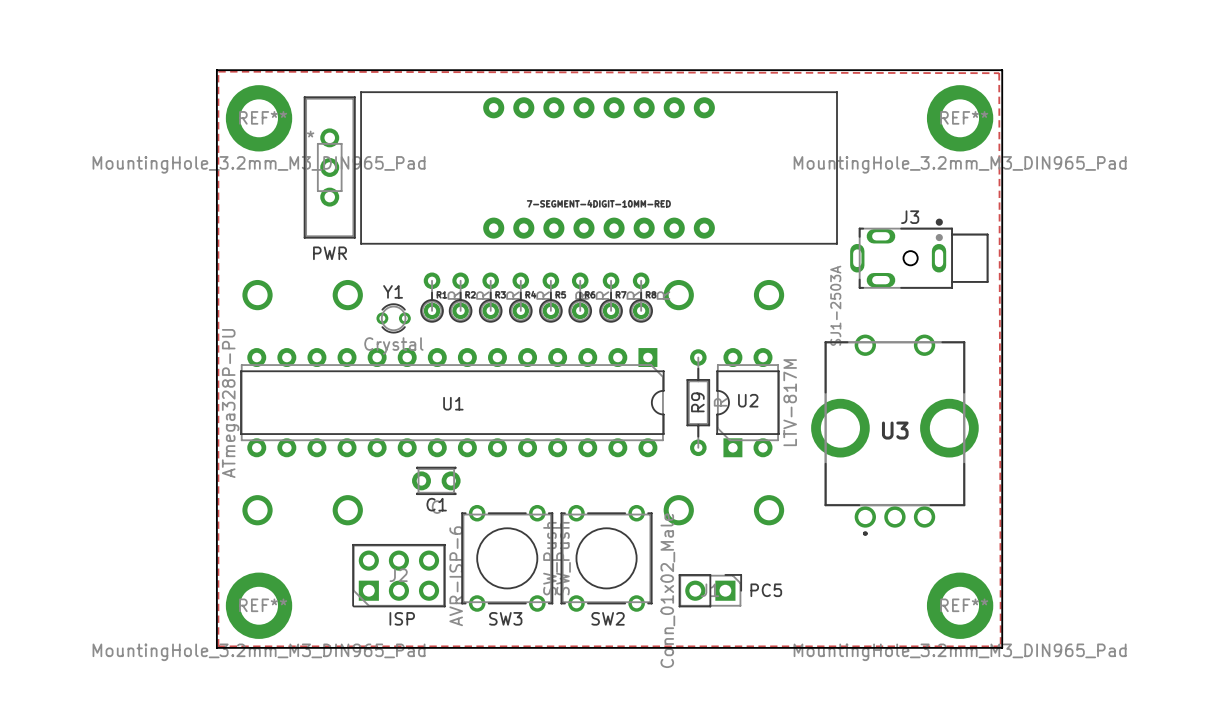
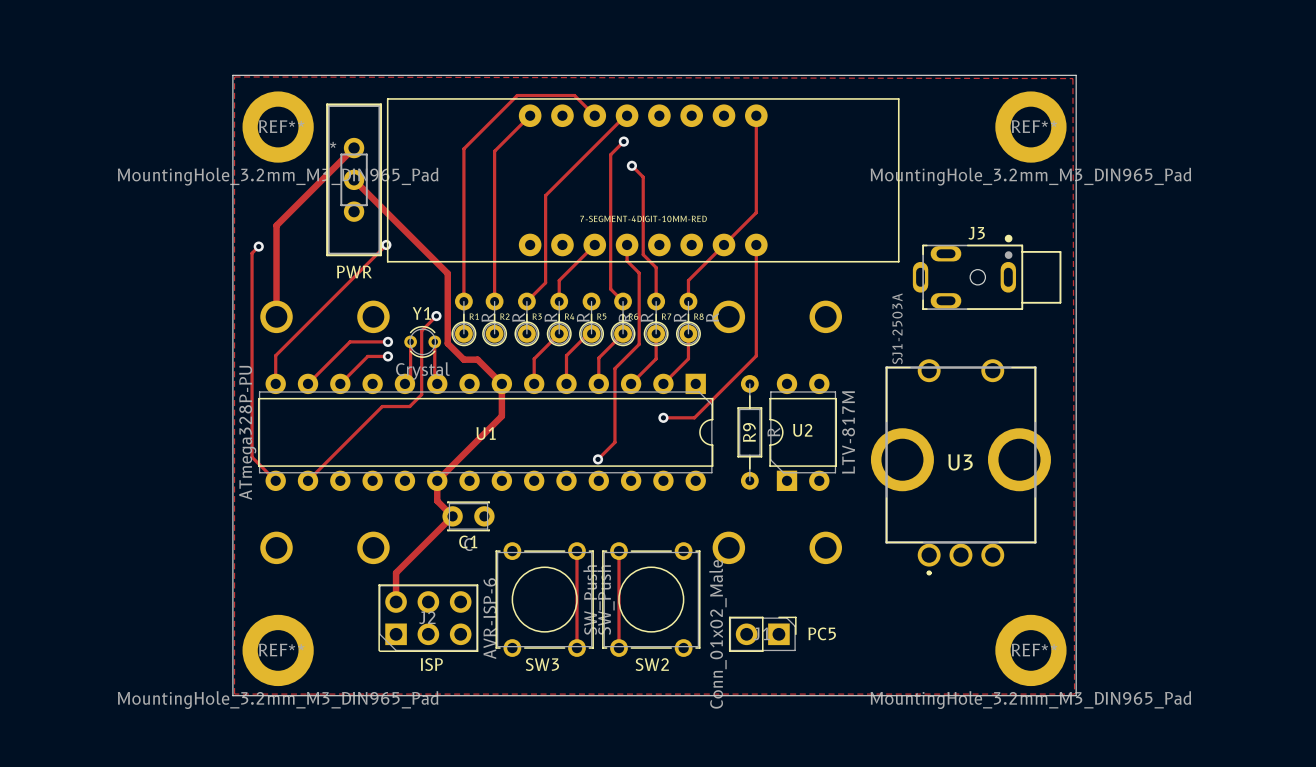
track: none -> (530, 115) (494, 151) (494, 301)
track: none -> (594, 115) (574, 95) (517, 95) (463, 148) (463, 301)
track: none -> (627, 115) (545, 195) (545, 282) (526, 301)
track: none -> (756, 115) (756, 212) (688, 280) (688, 301)
track: none -> (623, 141) (610, 154) (610, 289) (623, 301)
via: none -> (623, 141)
track: none -> (354, 148) (276, 225) (276, 316)
track: none -> (631, 165) (643, 177) (643, 254) (656, 267) (656, 301)
via: none -> (631, 165)
track: none -> (354, 179) (447, 273) (447, 343) (463, 359) (477, 359) (501, 383) (501, 416) (437, 480) (437, 501) (452, 516) (396, 572) (396, 601)
track: none -> (386, 244) (275, 355) (275, 383)
via: none -> (386, 244)
track: none -> (594, 244) (559, 280) (559, 301)
track: none -> (627, 244) (627, 260) (639, 273) (639, 344) (614, 368) (614, 442) (598, 459)
track: none -> (756, 244) (756, 356) (694, 417) (663, 417)
track: none -> (258, 246) (252, 253) (252, 457) (275, 480)
via: none -> (258, 246)
track: none -> (436, 316) (421, 330) (421, 394) (409, 406) (382, 406) (308, 480)
via: none -> (436, 316)
track: none -> (559, 333) (534, 358) (534, 383)
track: none -> (591, 333) (588, 333) (566, 355) (566, 383)
track: none -> (623, 333) (598, 358) (598, 383)
track: none -> (656, 333) (656, 358) (631, 383)
track: none -> (688, 333) (688, 358) (663, 383)
track: none -> (387, 341) (350, 341) (308, 383)
via: none -> (387, 341)
track: none -> (410, 341) (410, 378) (404, 383)
track: none -> (434, 341) (434, 381) (437, 383)
track: none -> (387, 356) (367, 356) (340, 383)
via: none -> (387, 356)
via: none -> (663, 417)
via: none -> (598, 459)
track: none -> (576, 551) (576, 648)
track: none -> (619, 551) (619, 648)

